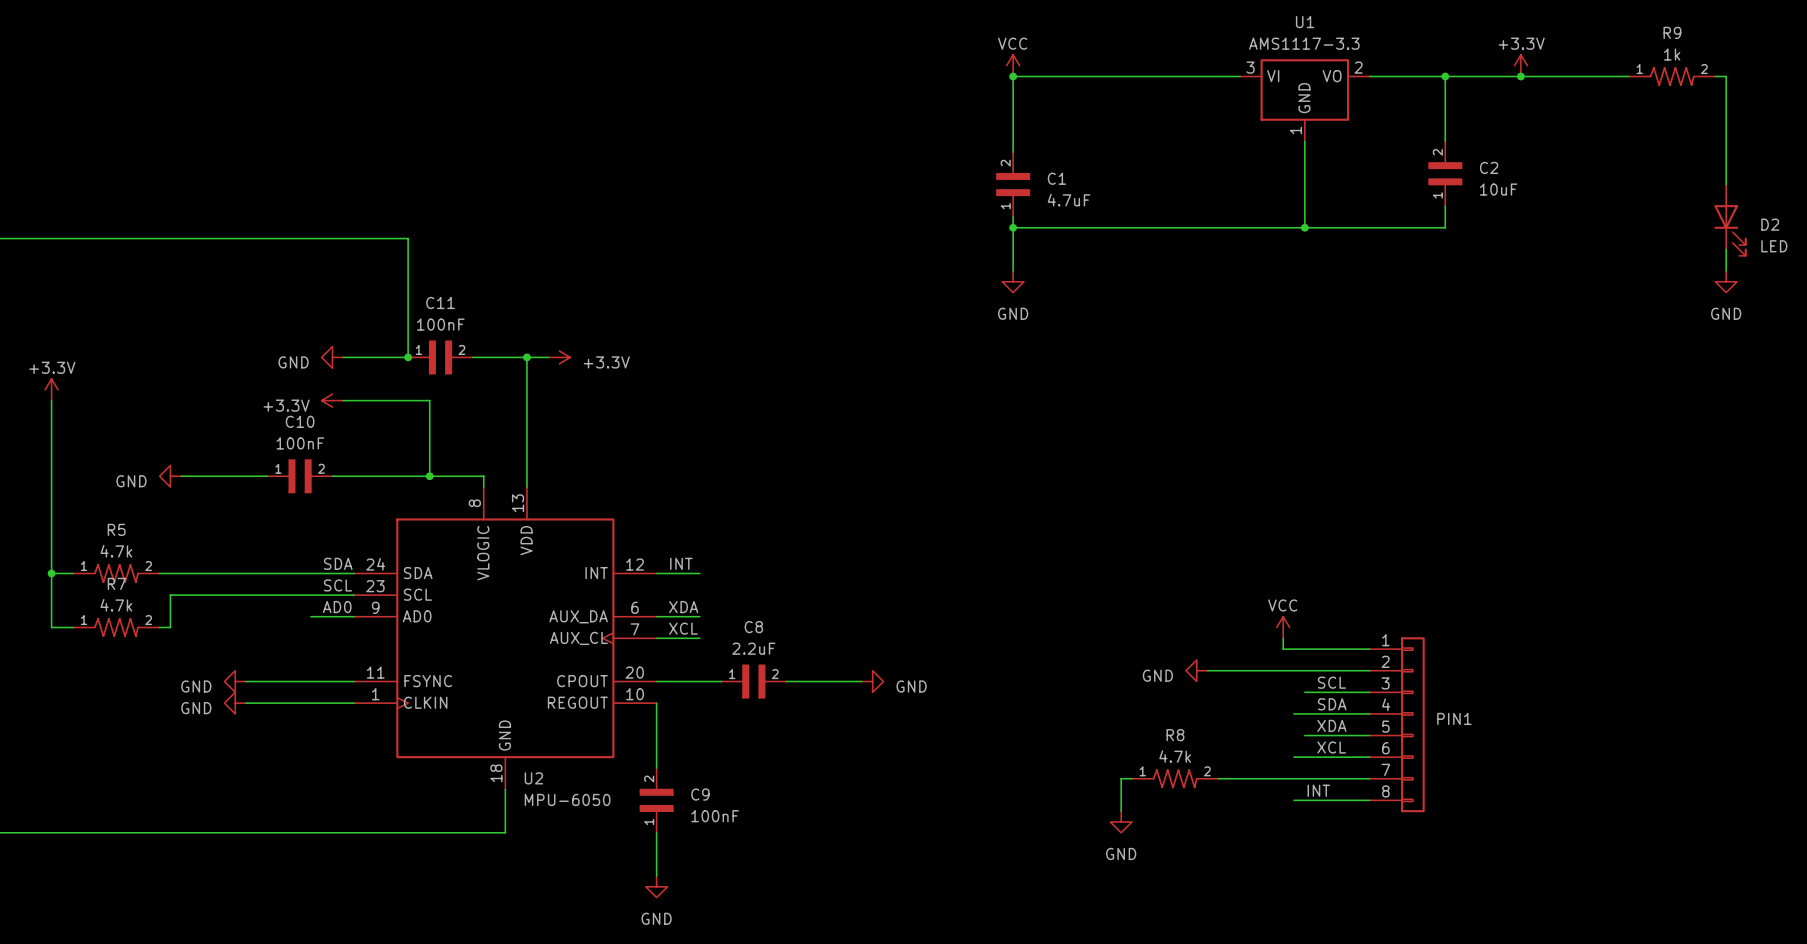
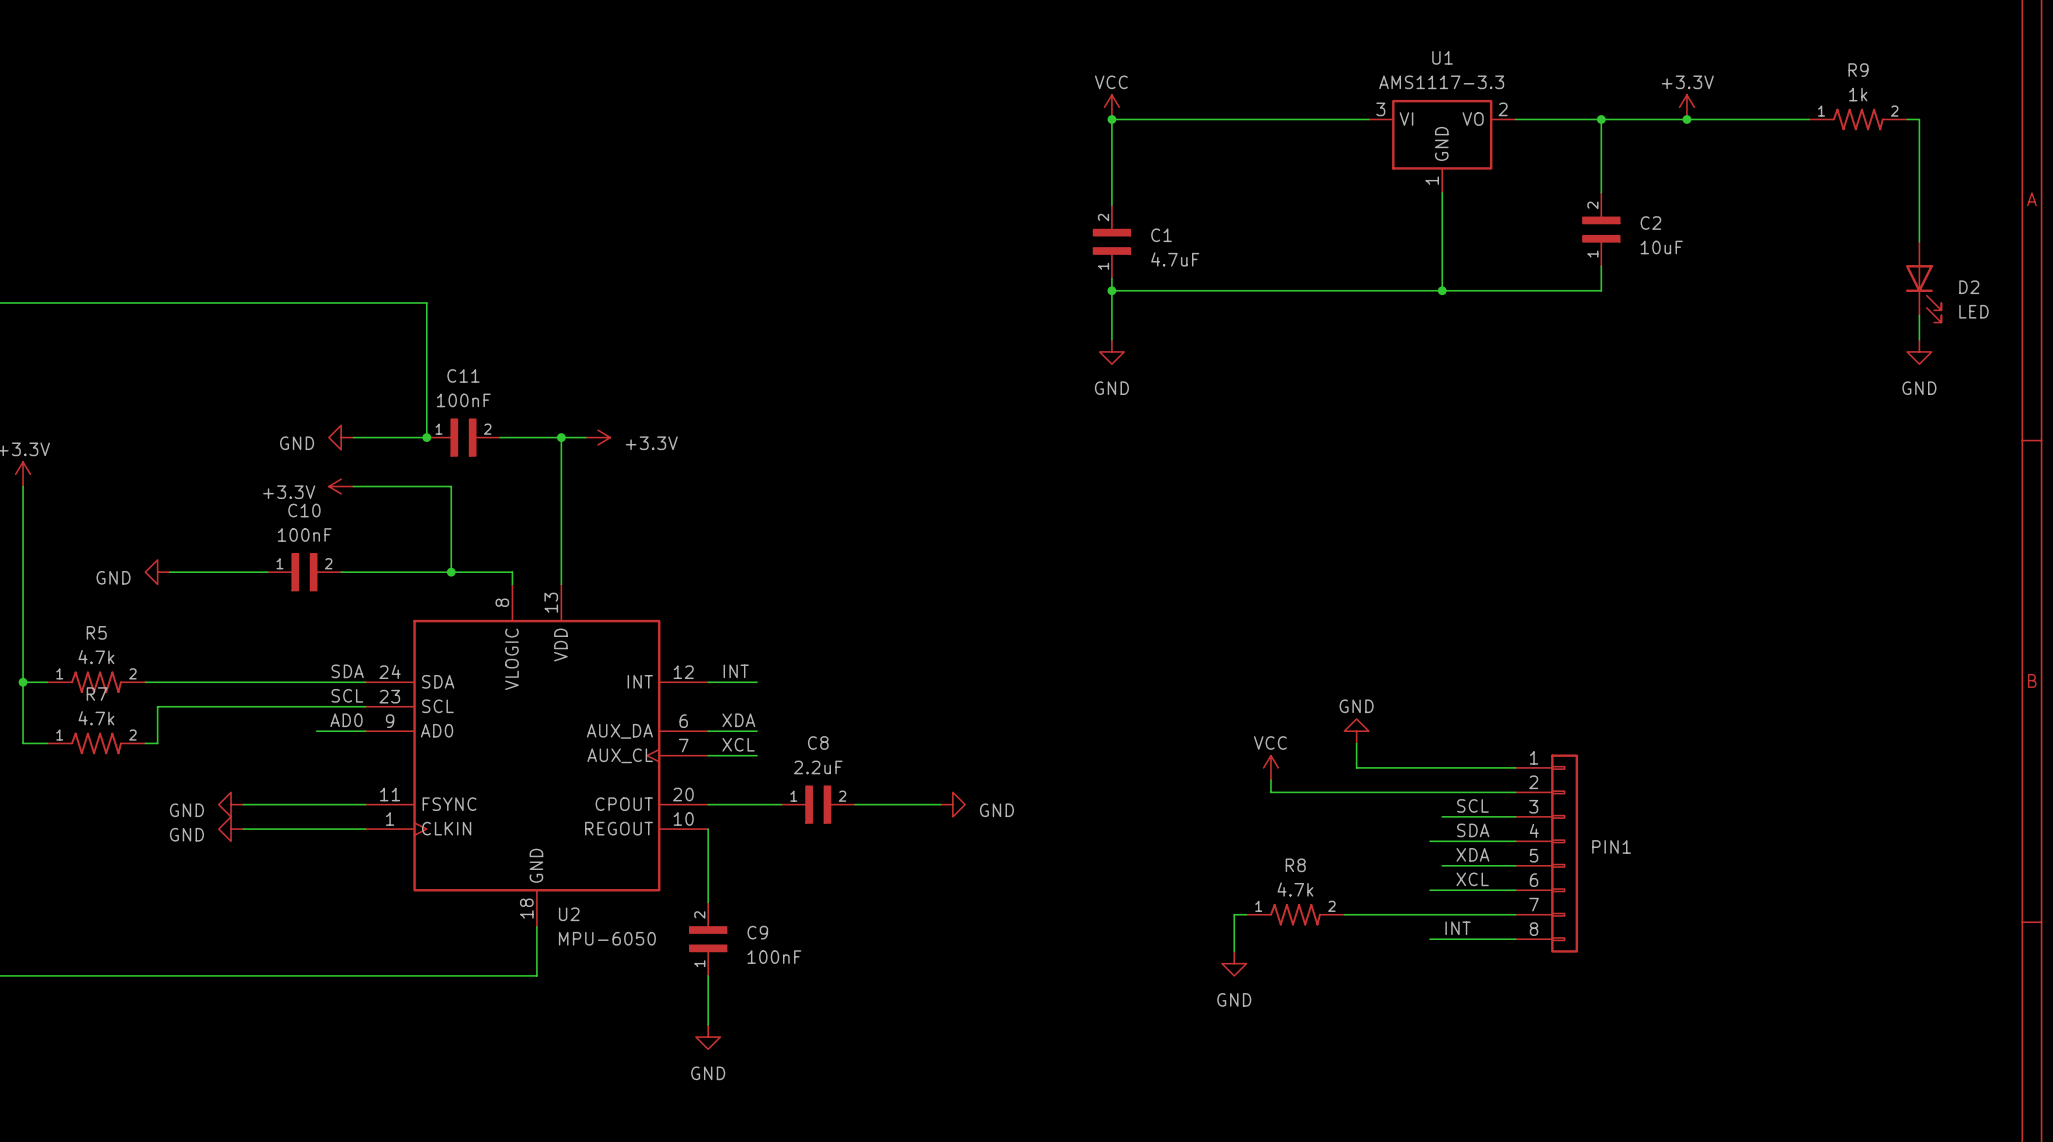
power symbol position: VCC (1283, 627) -> VCC (1270, 767)
wire: (1283, 638) (1283, 649) -> (1356, 743) (1356, 767) (1417, 767)
wire: none -> (1270, 780) (1270, 792) (1332, 792)
power symbol rotation: 0° (1196, 670) -> 90° clockwise (1356, 731)
power symbol position: GND (1196, 670) -> GND (1356, 731)
power symbol text position: GND (1157, 675) -> GND (1356, 706)

